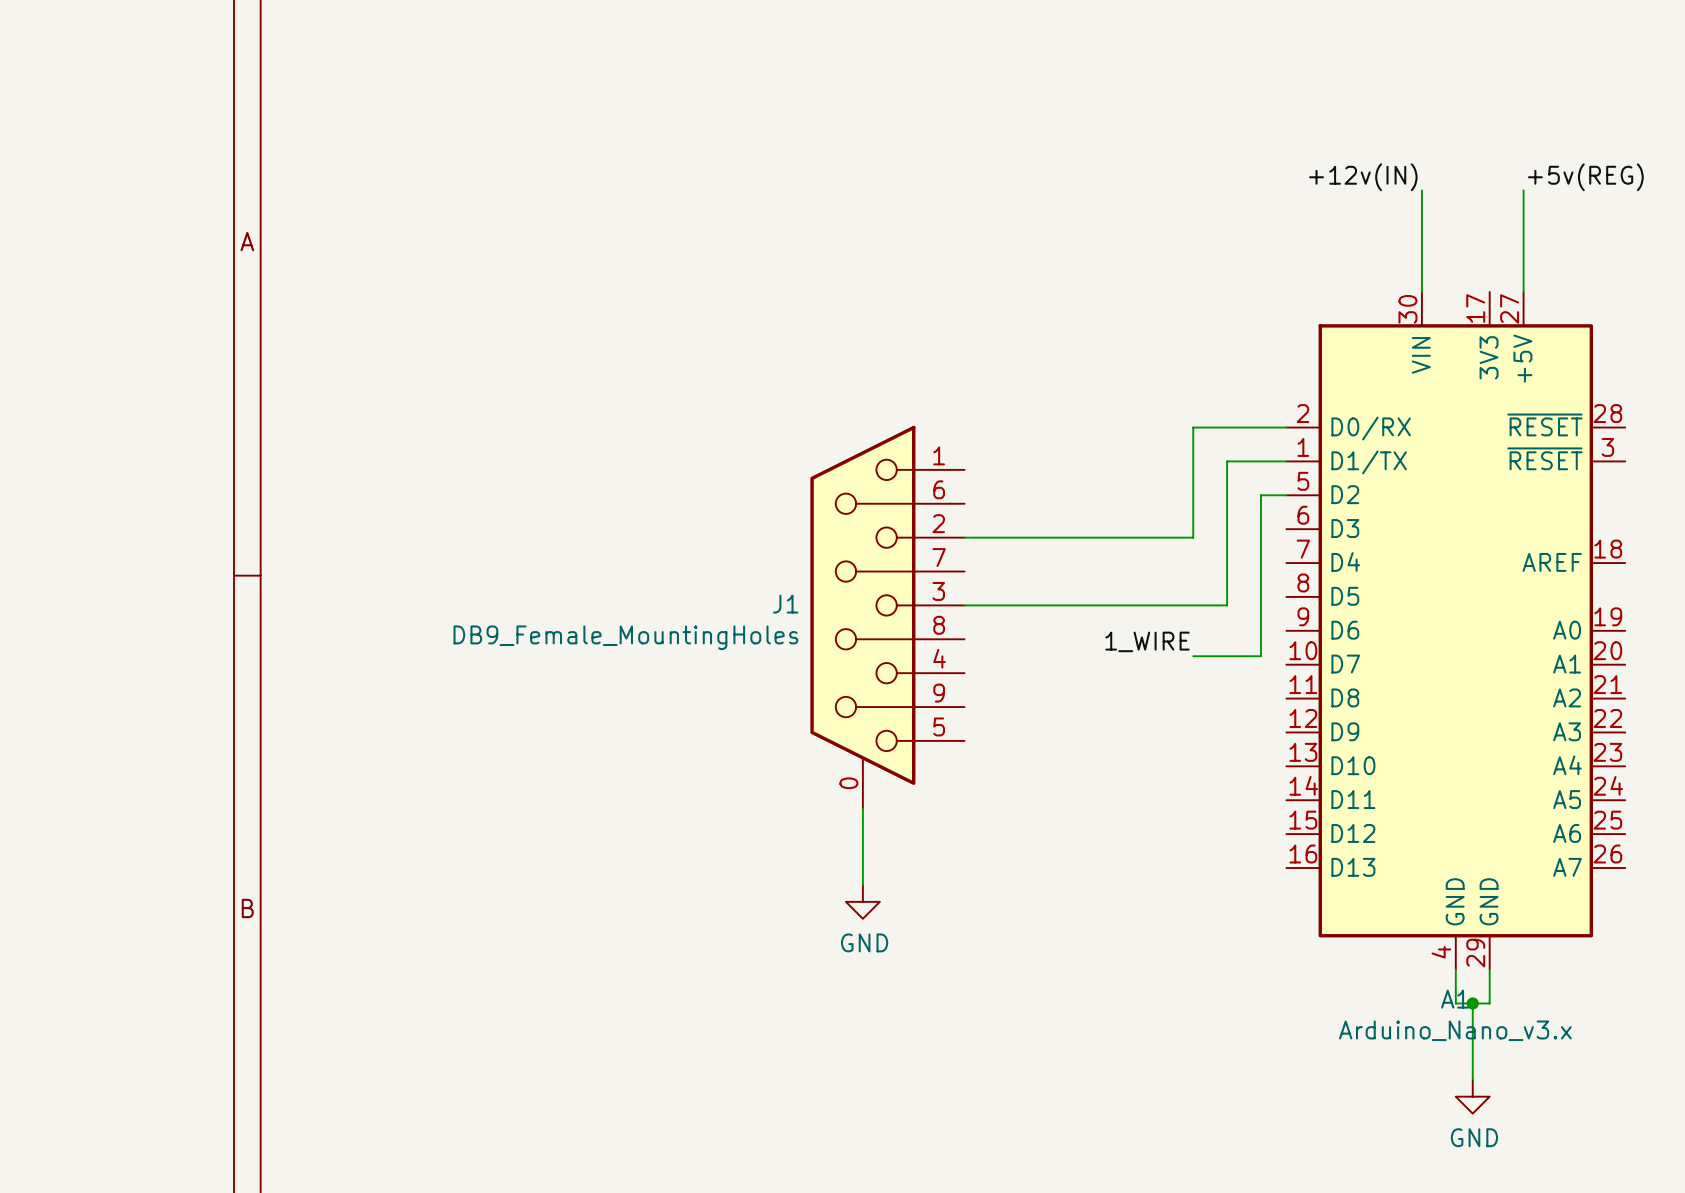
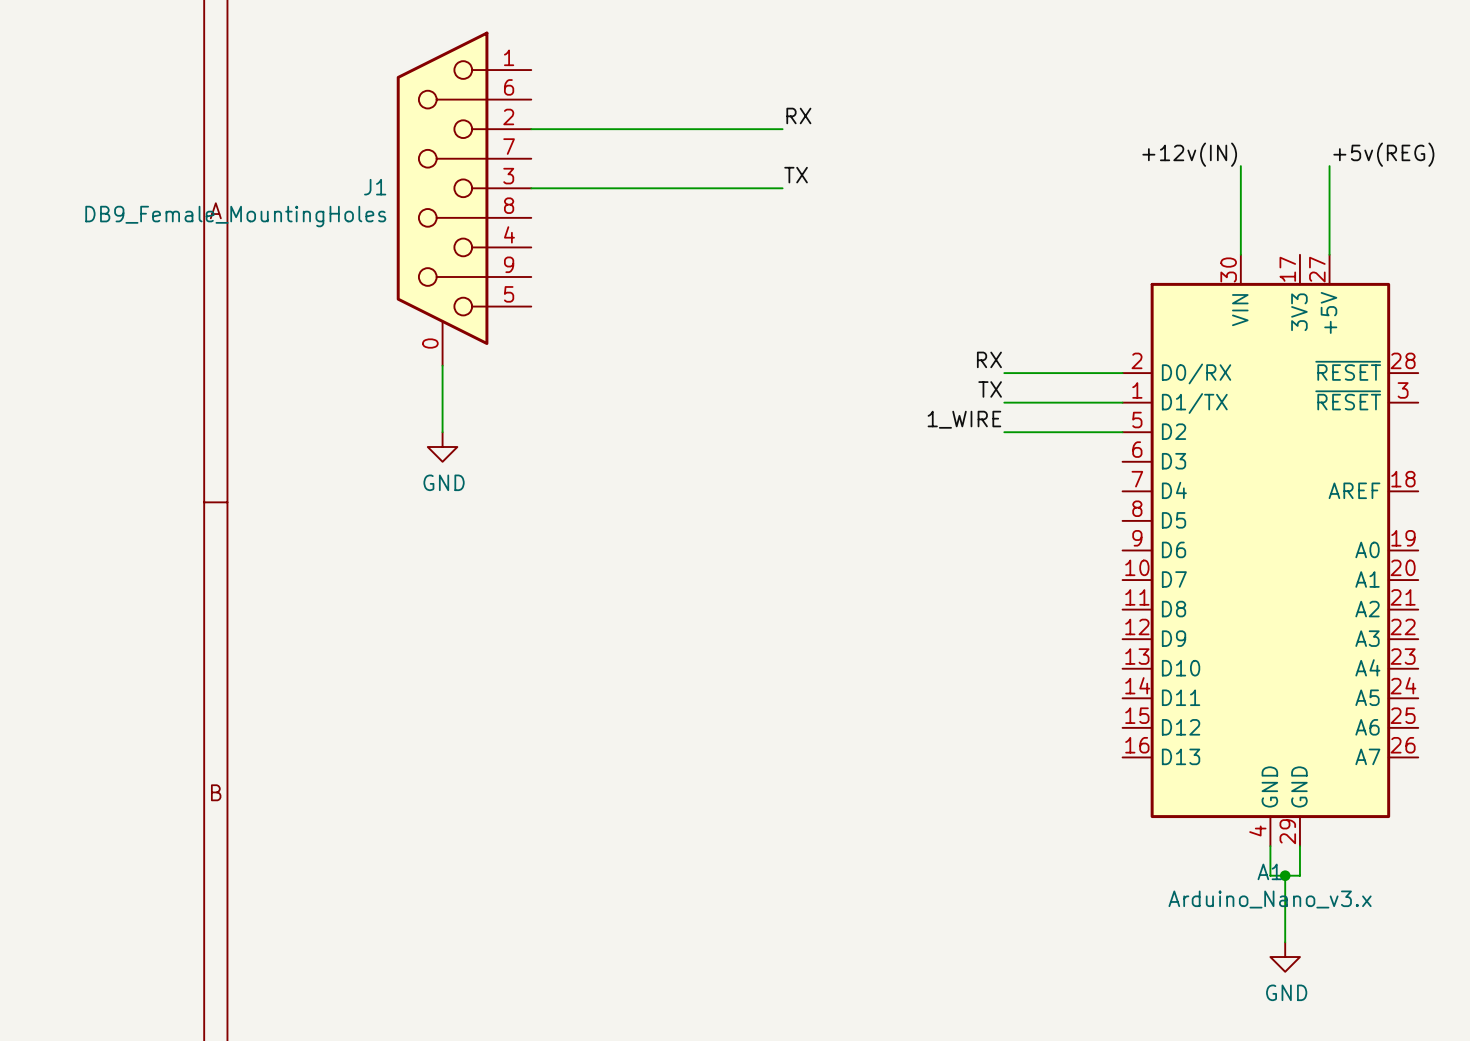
label: none -> RX (798, 115)
wire: none -> (531, 129) (782, 129)
label: none -> TX (796, 175)
wire: none -> (531, 188) (782, 188)
label: none -> RX (989, 359)
wire: none -> (442, 365) (442, 432)
wire: (1193, 427) (1193, 537) (964, 537) -> (1041, 373) (1004, 373)
label: none -> TX (990, 389)
wire: (1227, 461) (1227, 605) (964, 605) -> (1070, 402) (1004, 402)
wire: (1260, 495) (1260, 656) (1193, 656) -> (1100, 432) (1004, 432)
power symbol: none -> GND (442, 447)
J1 position: (887, 617) -> (464, 198)
label position: 1_WIRE (1147, 641) -> 1_WIRE (964, 419)
wire: (862, 808) (862, 884) -> none
power symbol: GND (862, 901) -> none

